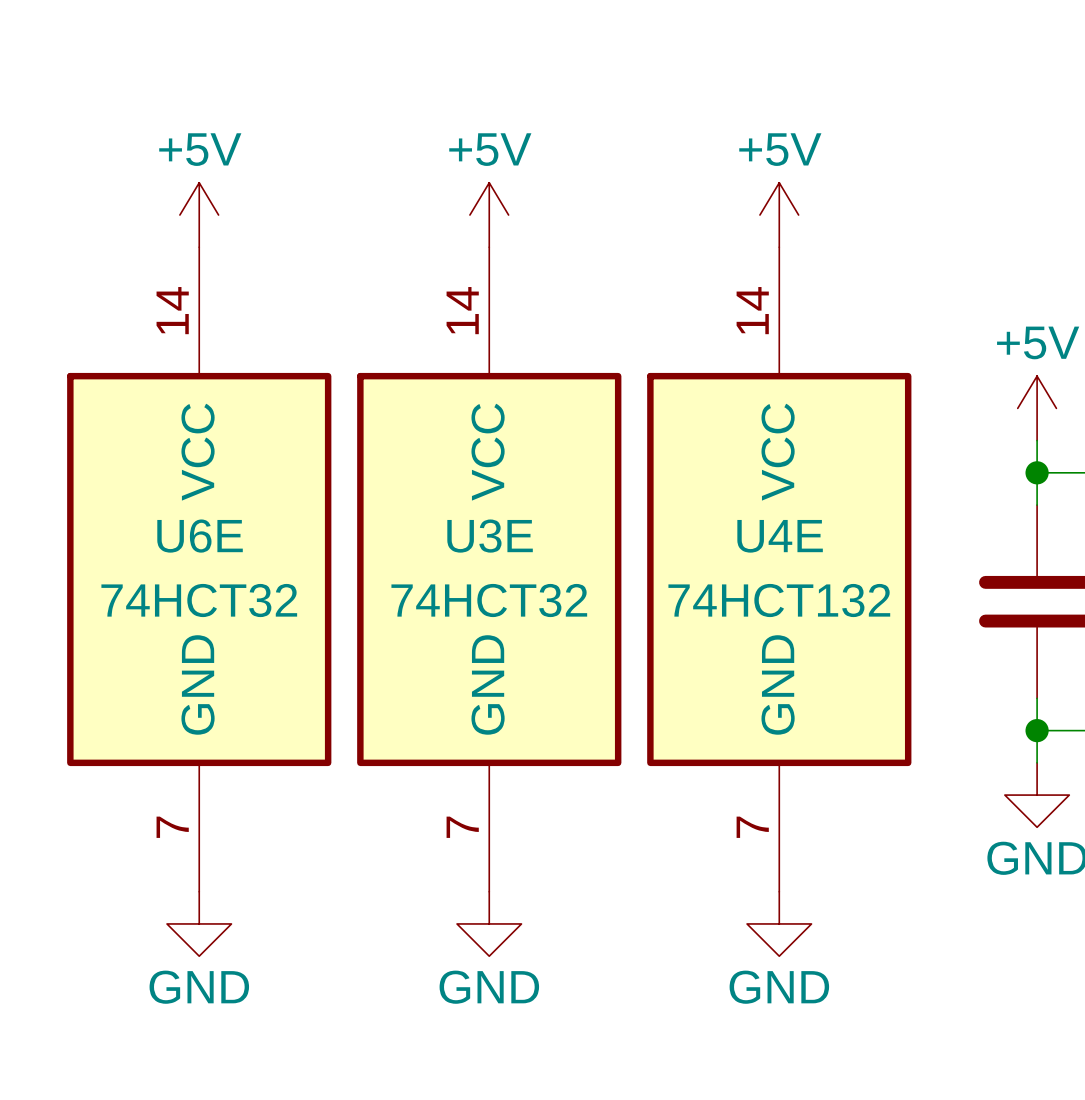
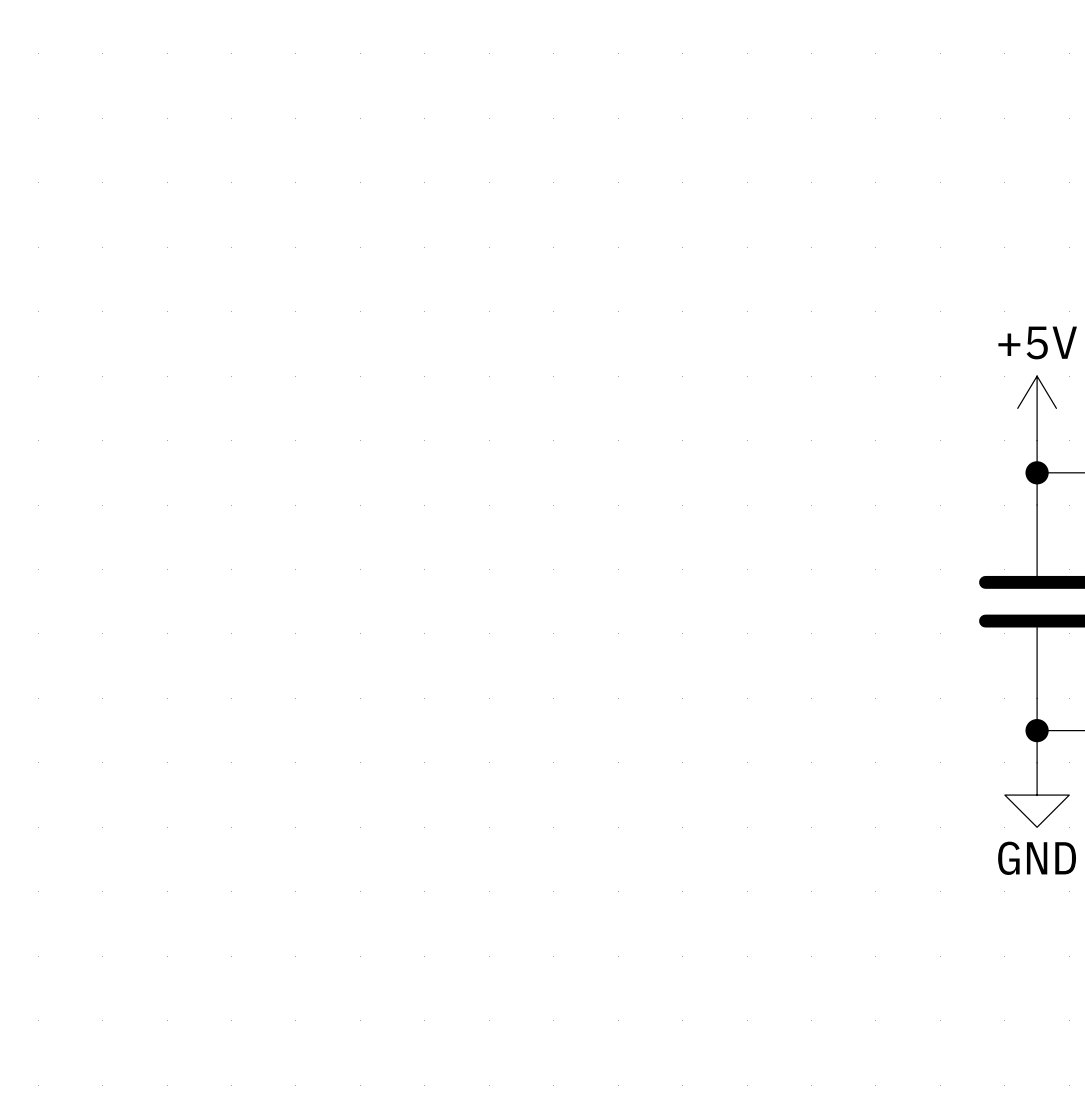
power symbol: +5V (199, 215) -> none
power symbol: +5V (489, 215) -> none
power symbol: +5V (779, 215) -> none
U6E: 74HCT32 (199, 569) -> none
U3E: 74HCT32 (489, 569) -> none
U4E: 74HCT132 (779, 569) -> none
power symbol: GND (199, 923) -> none
power symbol: GND (489, 923) -> none
power symbol: GND (779, 923) -> none

